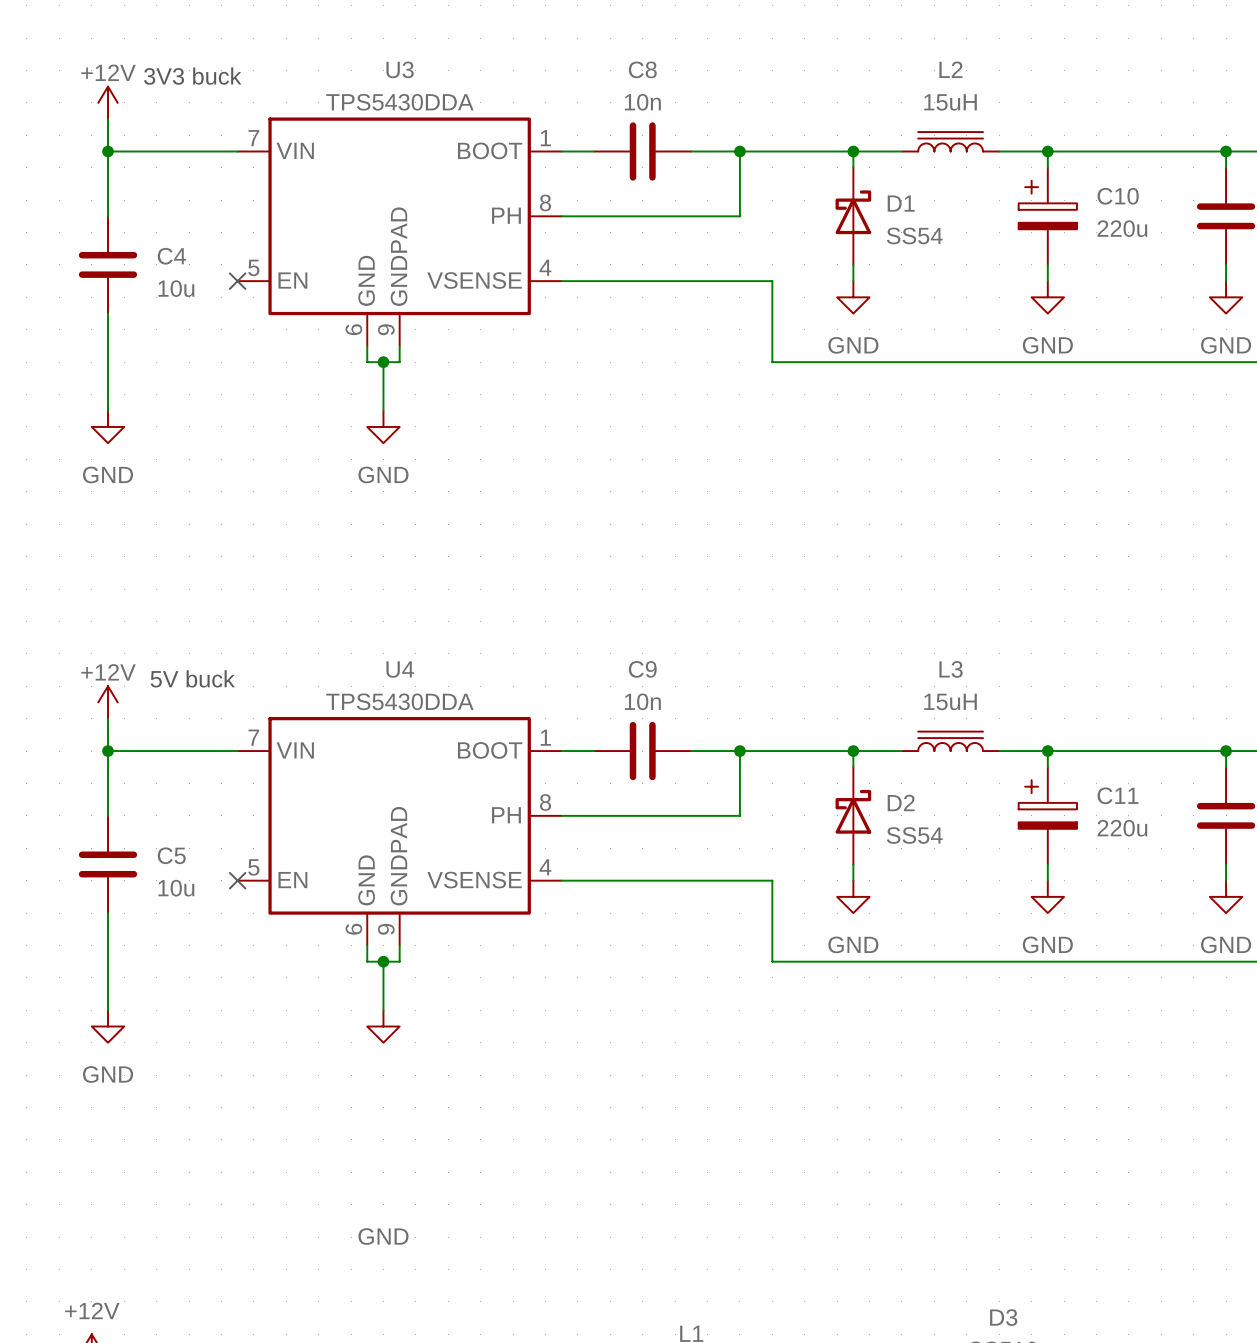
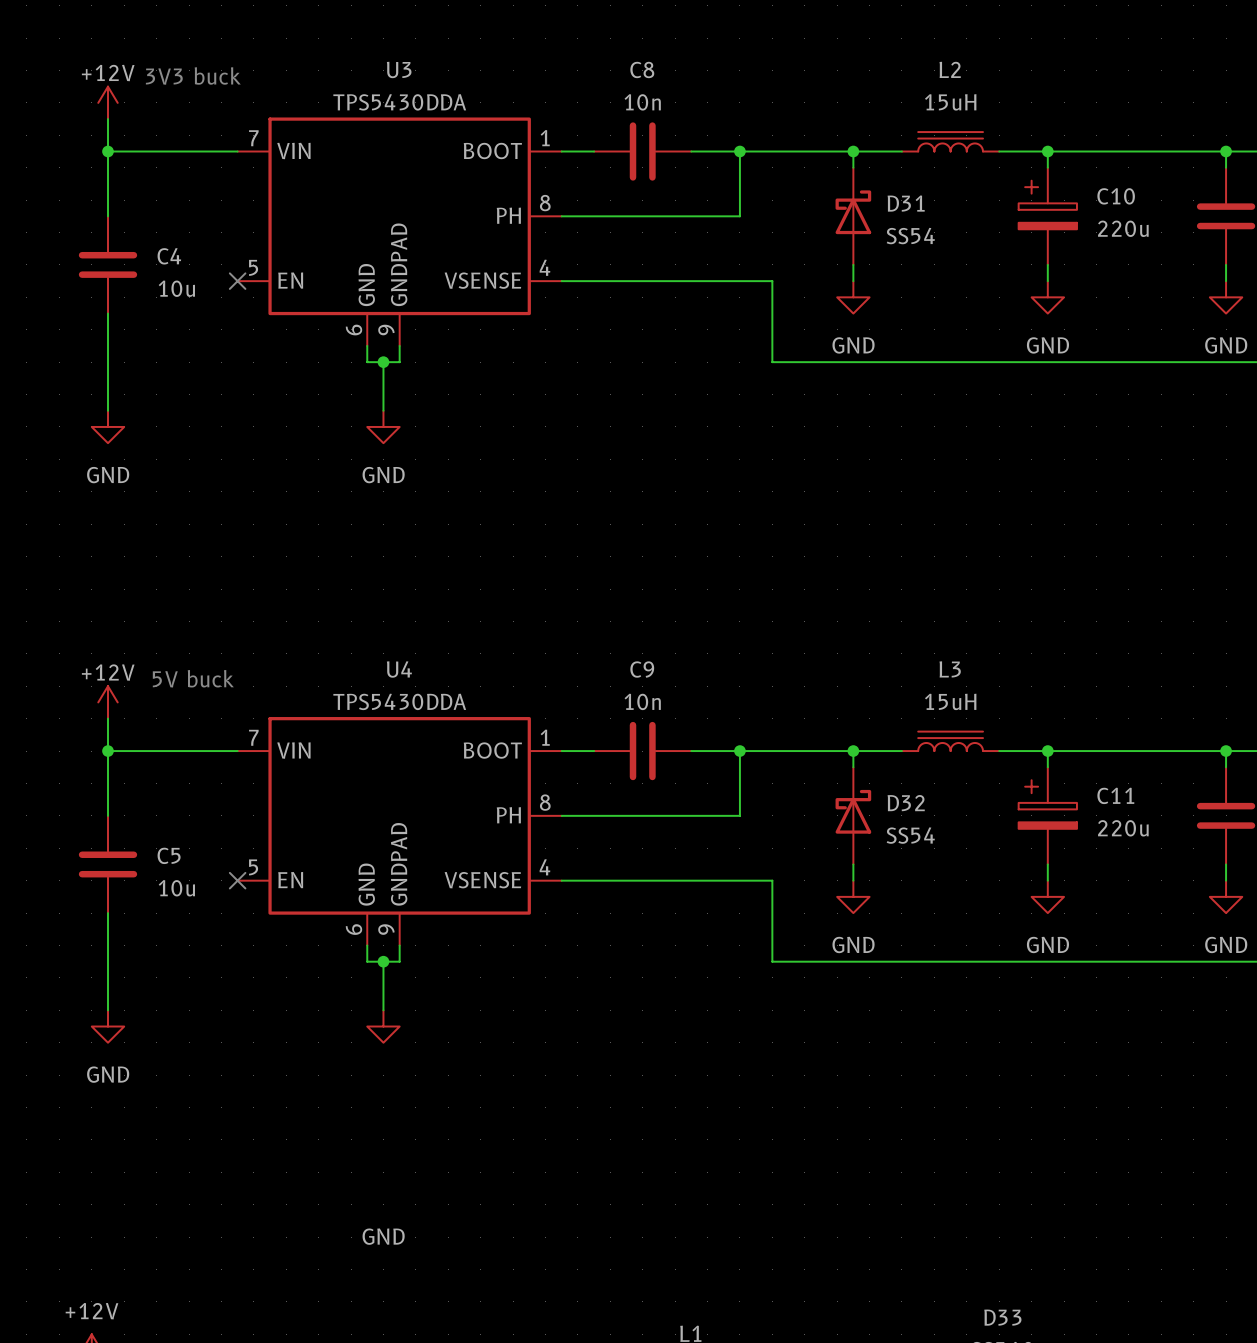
D1 name: D1 (901, 203) -> D31 (906, 203)
D2 name: D2 (901, 802) -> D32 (906, 803)
D3 name: D3 (1003, 1317) -> D33 (1002, 1317)

